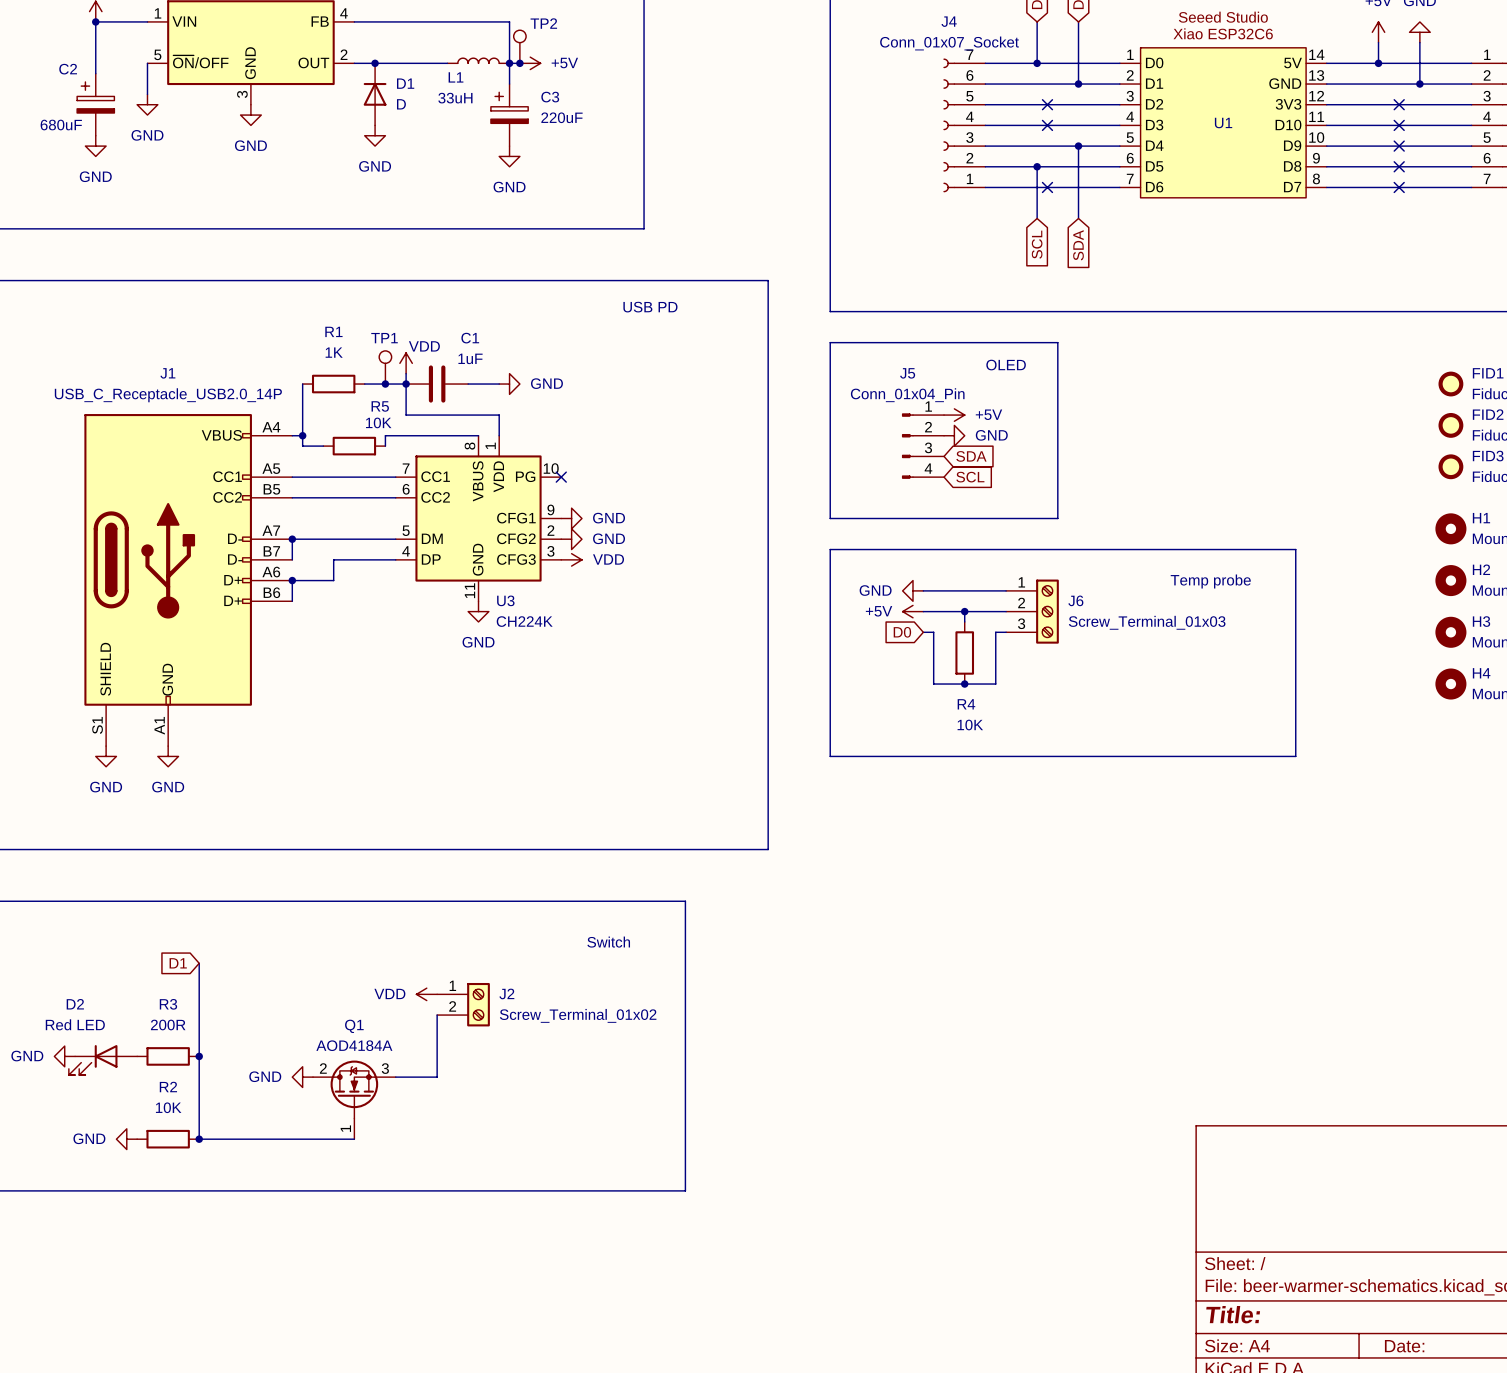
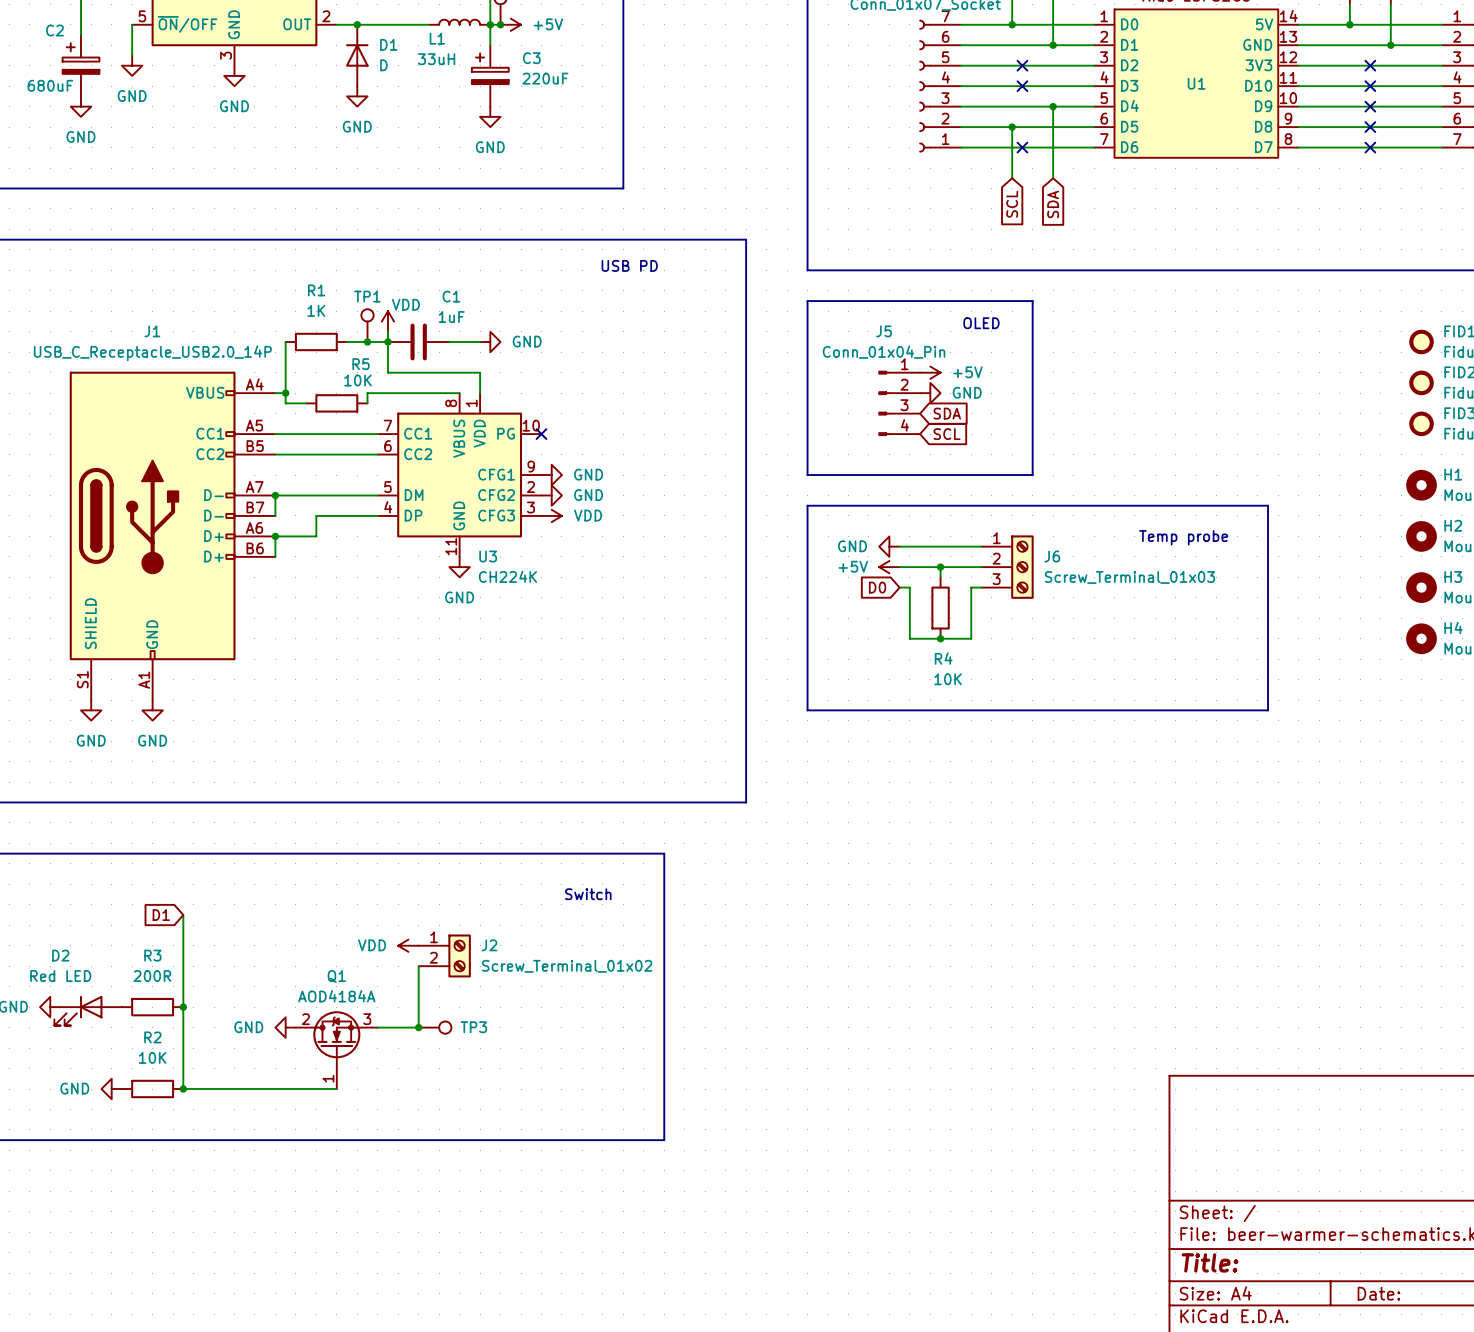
junction: none -> (418, 1027)
TP3: none -> (435, 1027)

